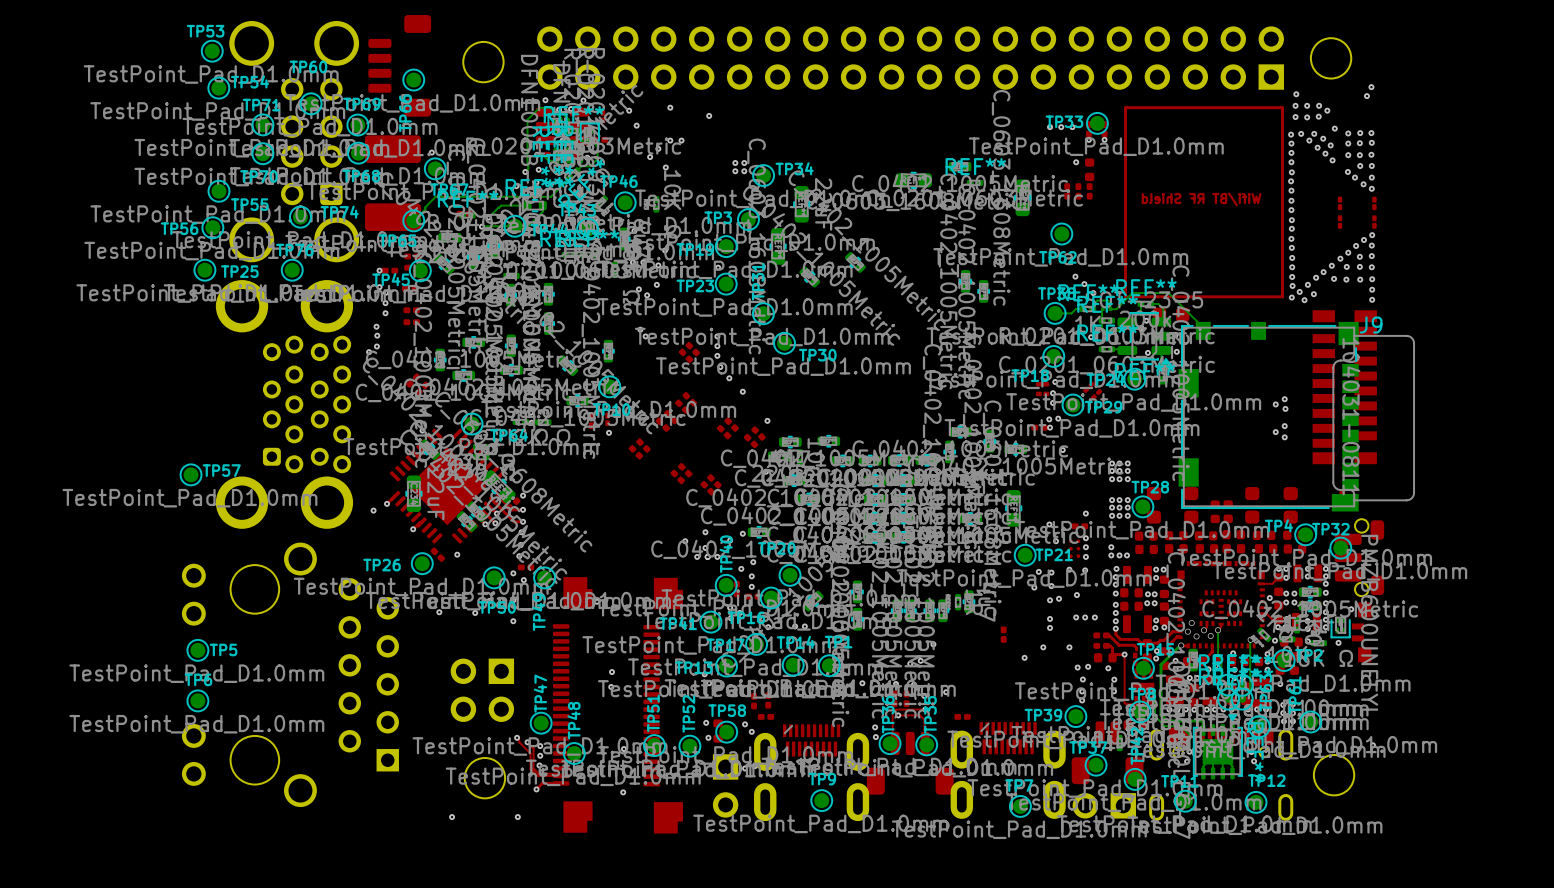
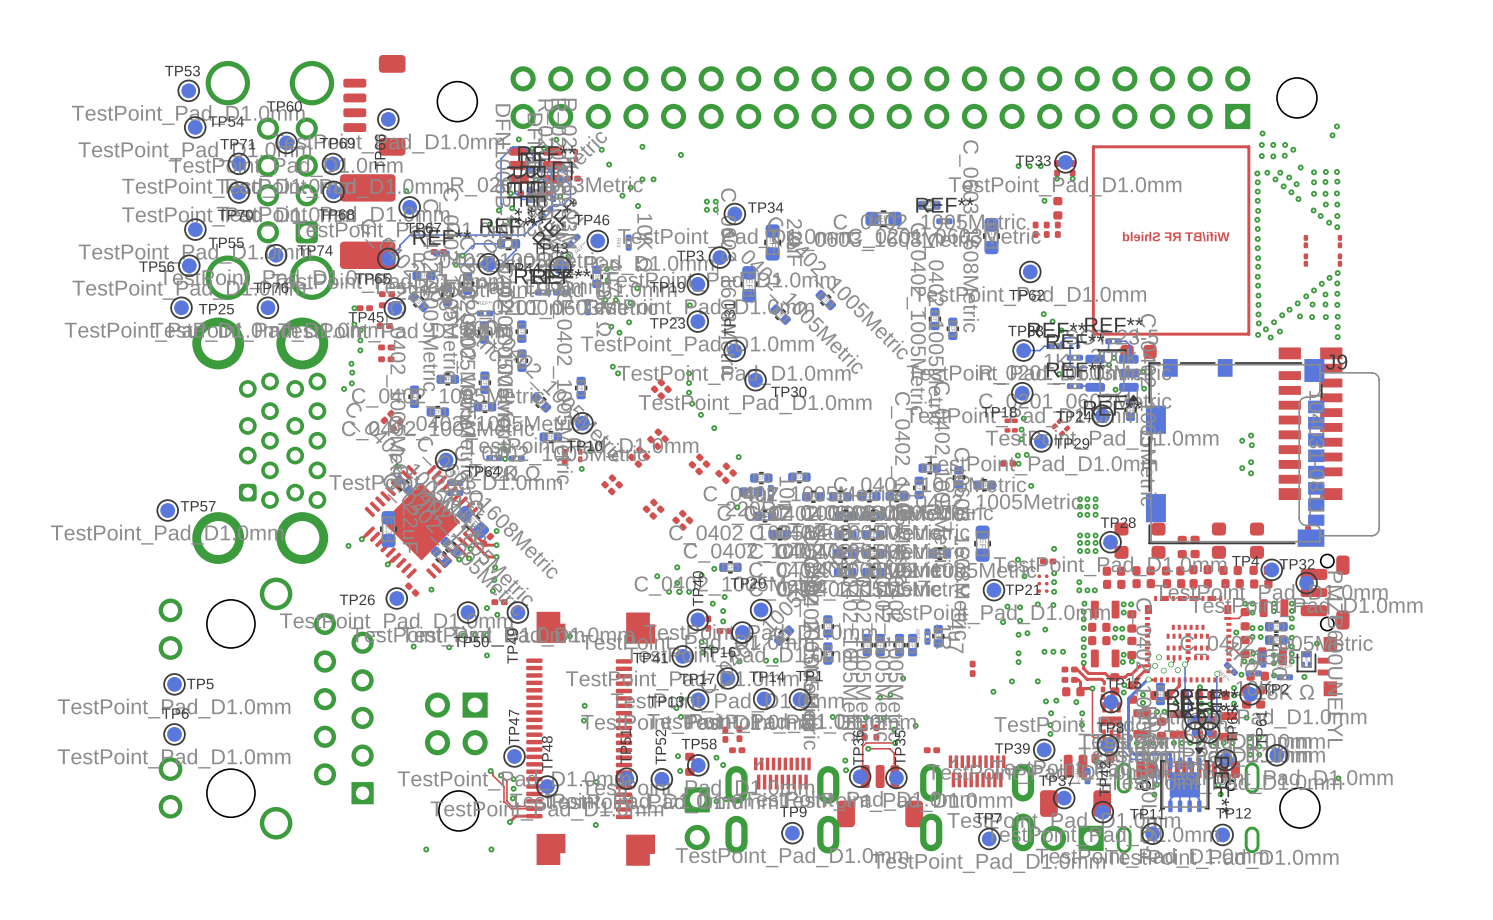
bottom track: (1110, 309) (1116, 309) (1132, 293) (1168, 293) (1203, 327) (1203, 330) -> none

